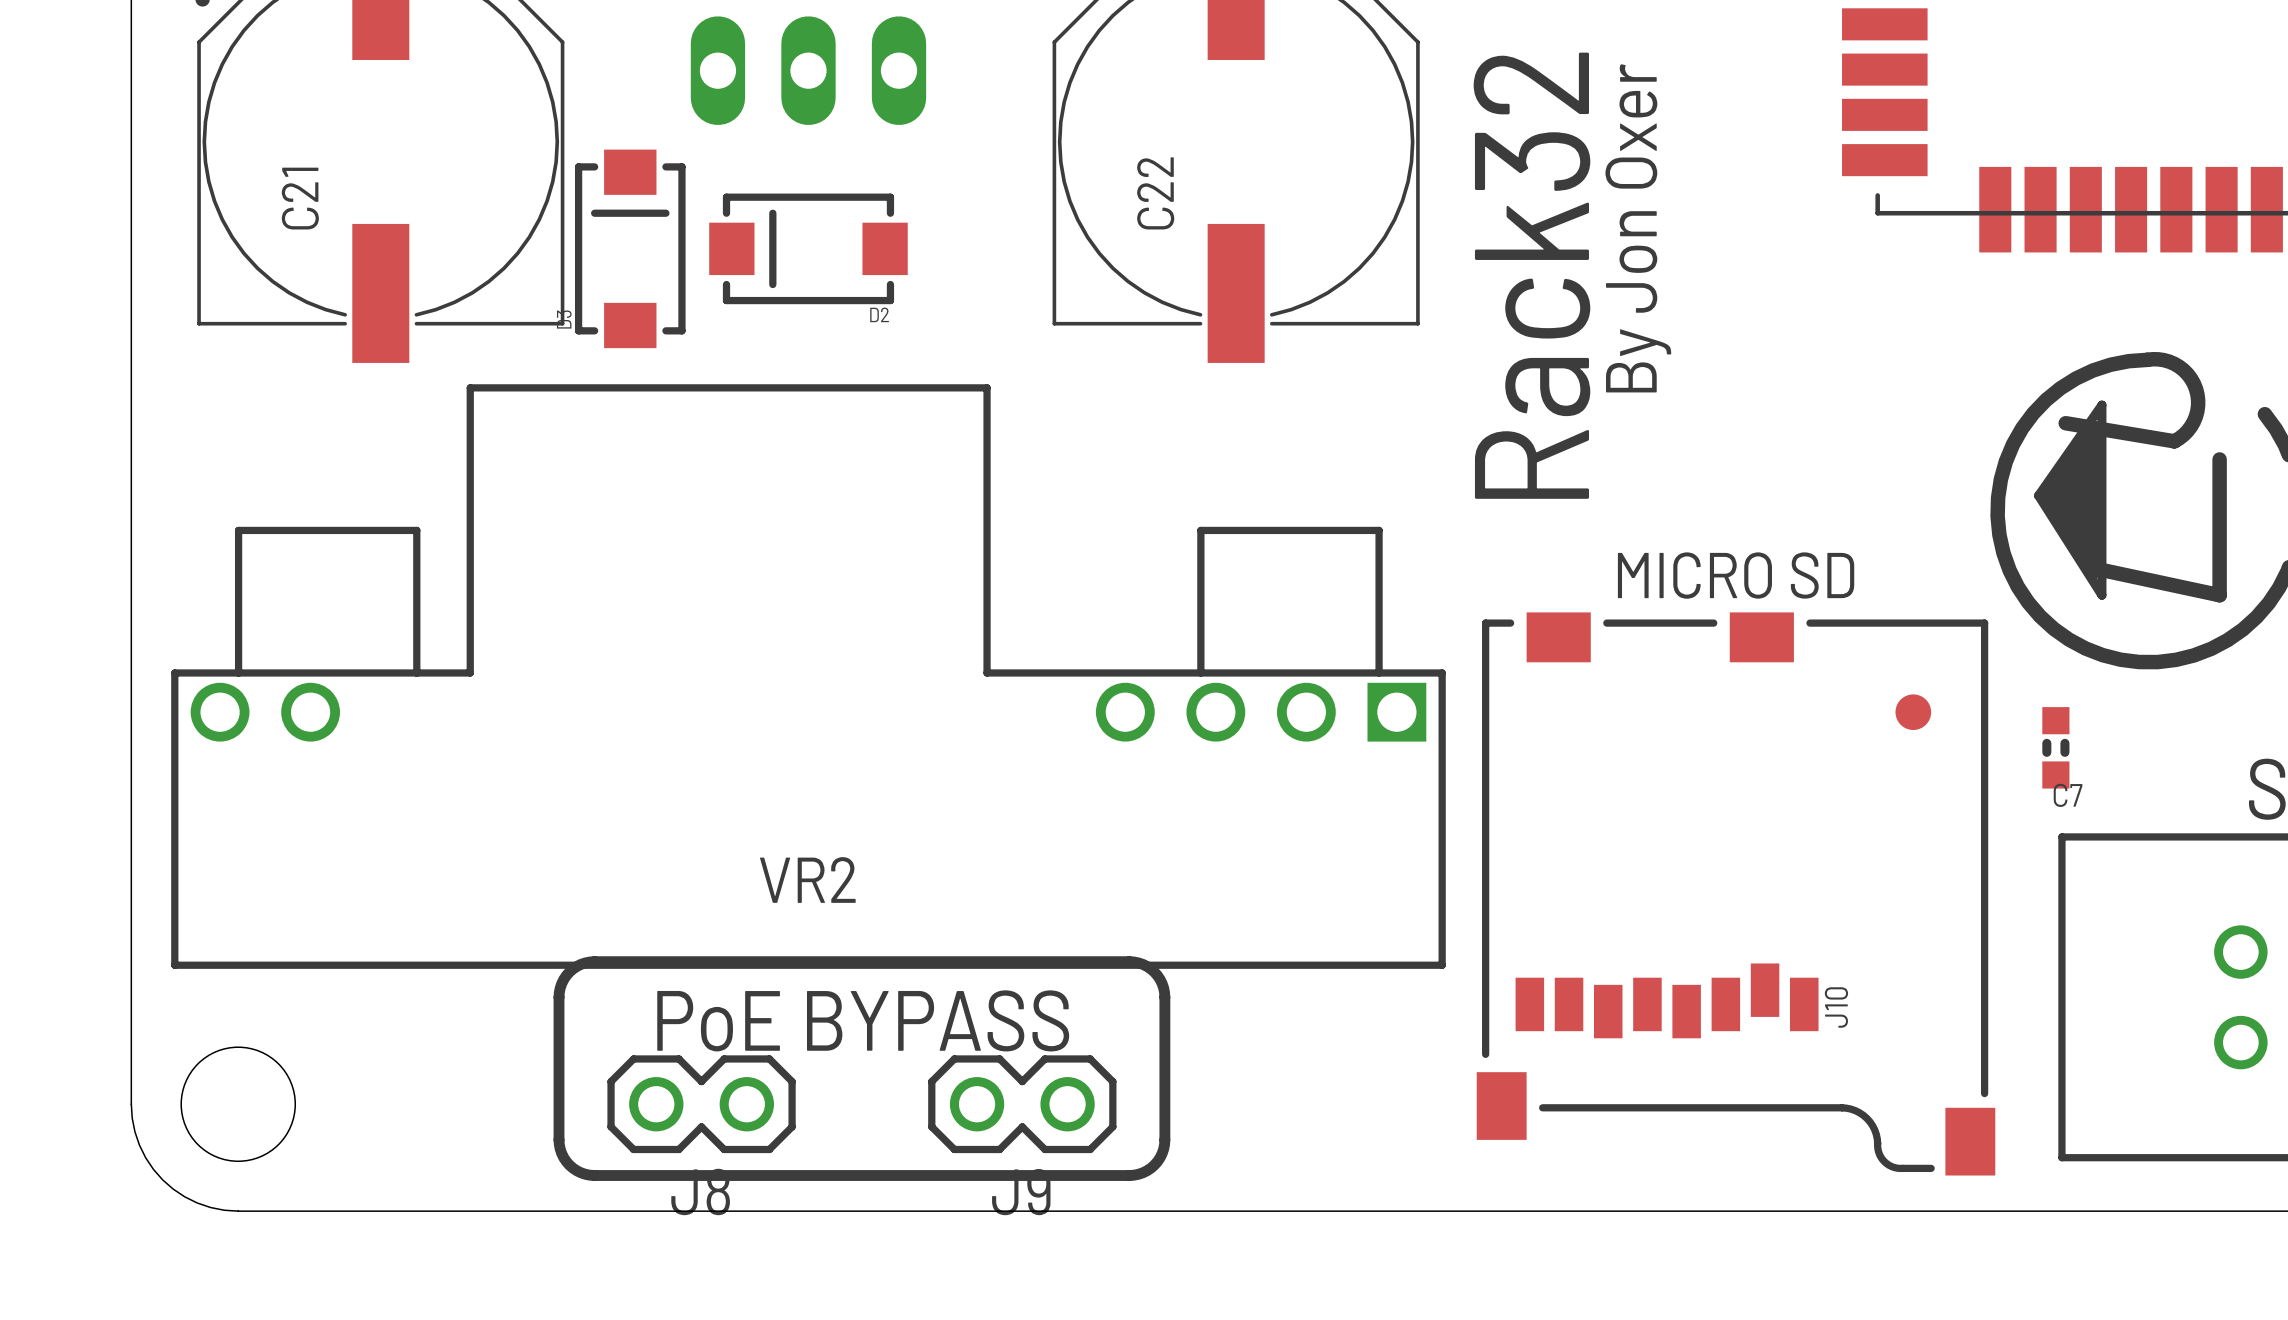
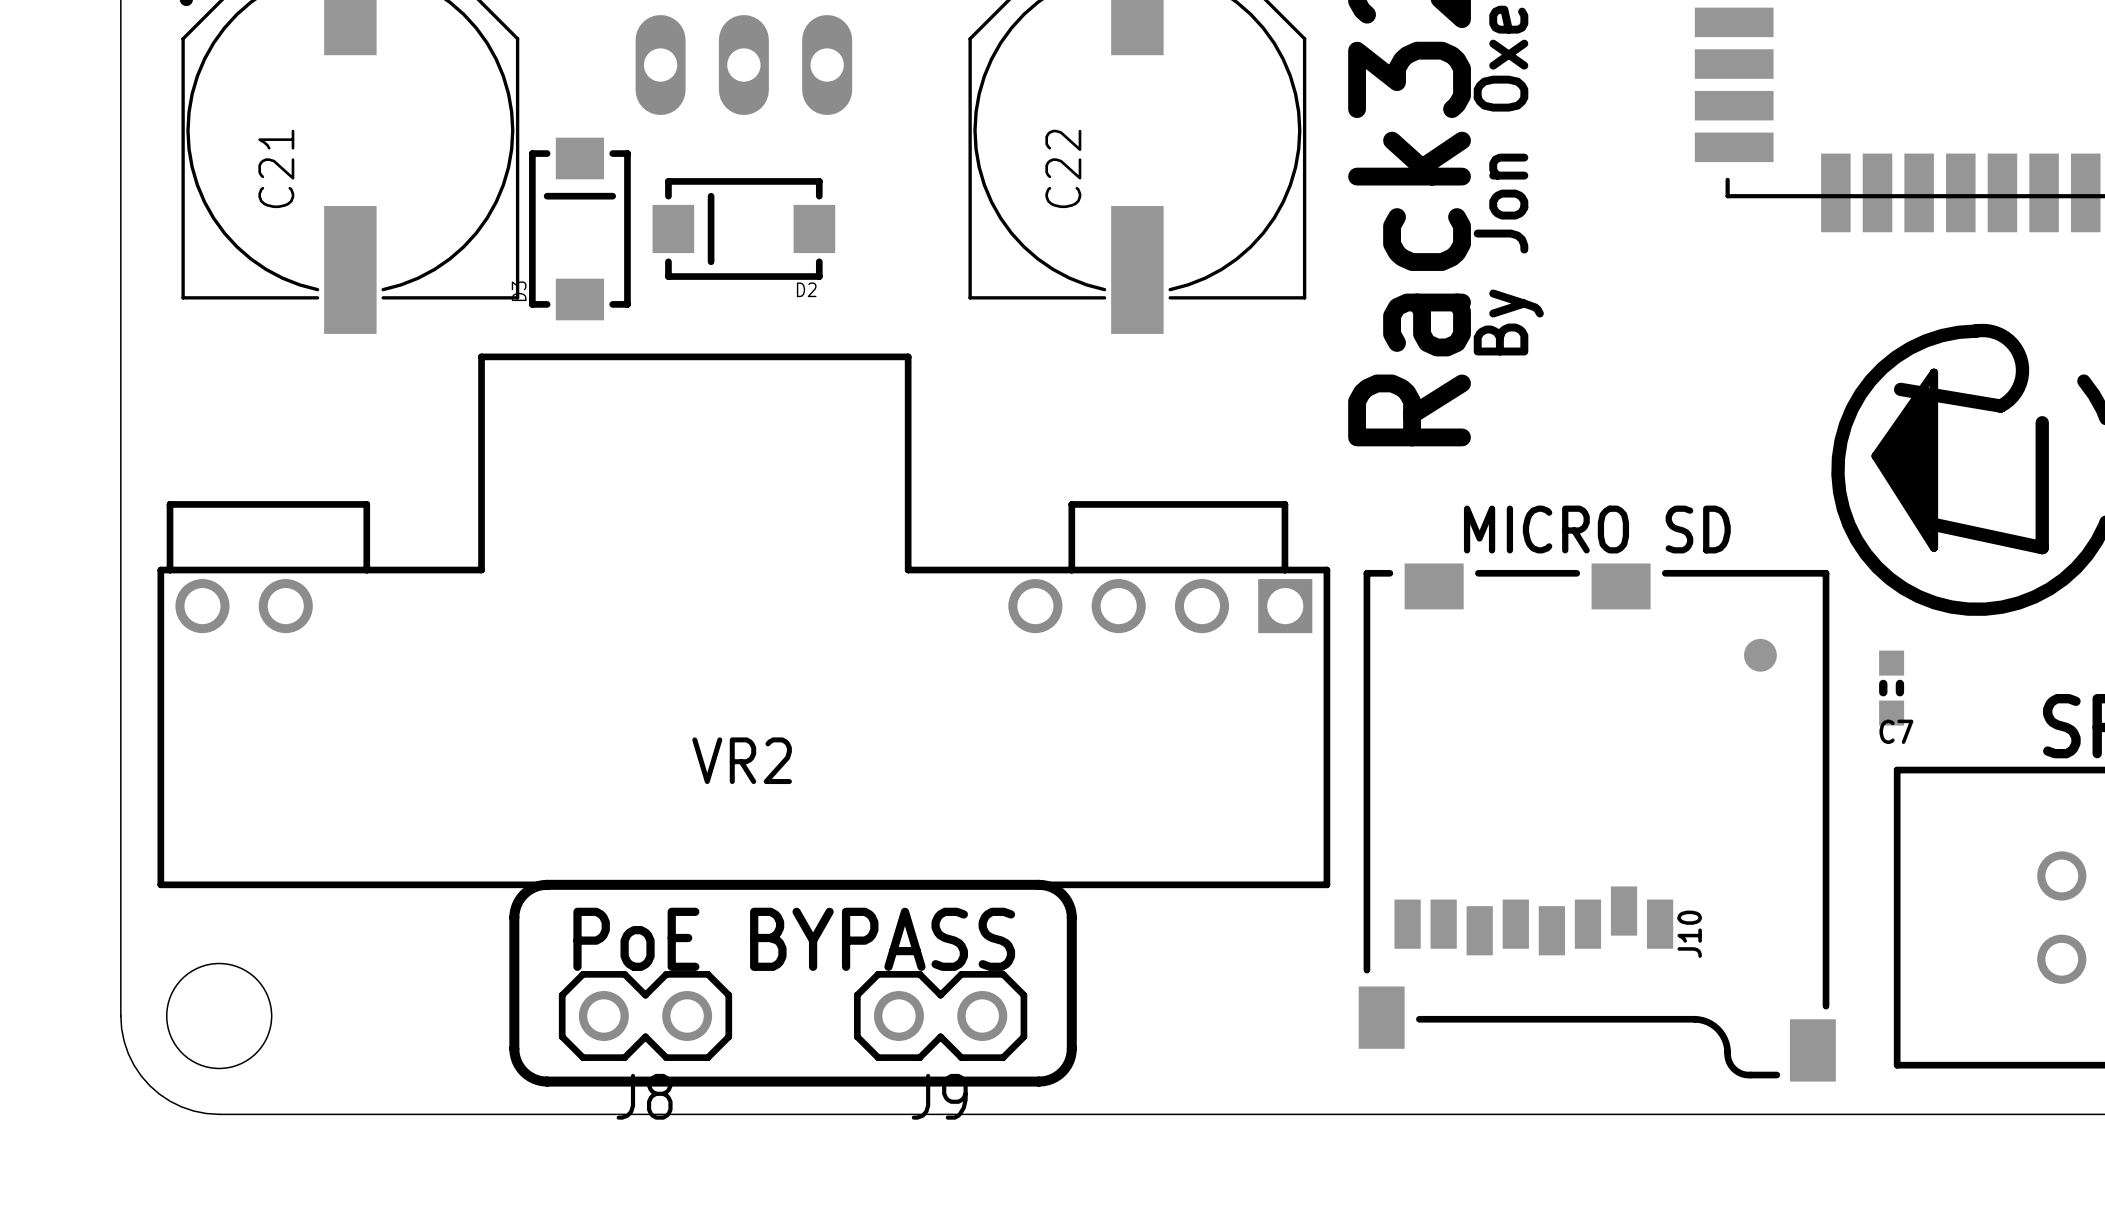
VR2 footprint: [171, 384, 1446, 969] -> [157, 353, 1331, 889]

